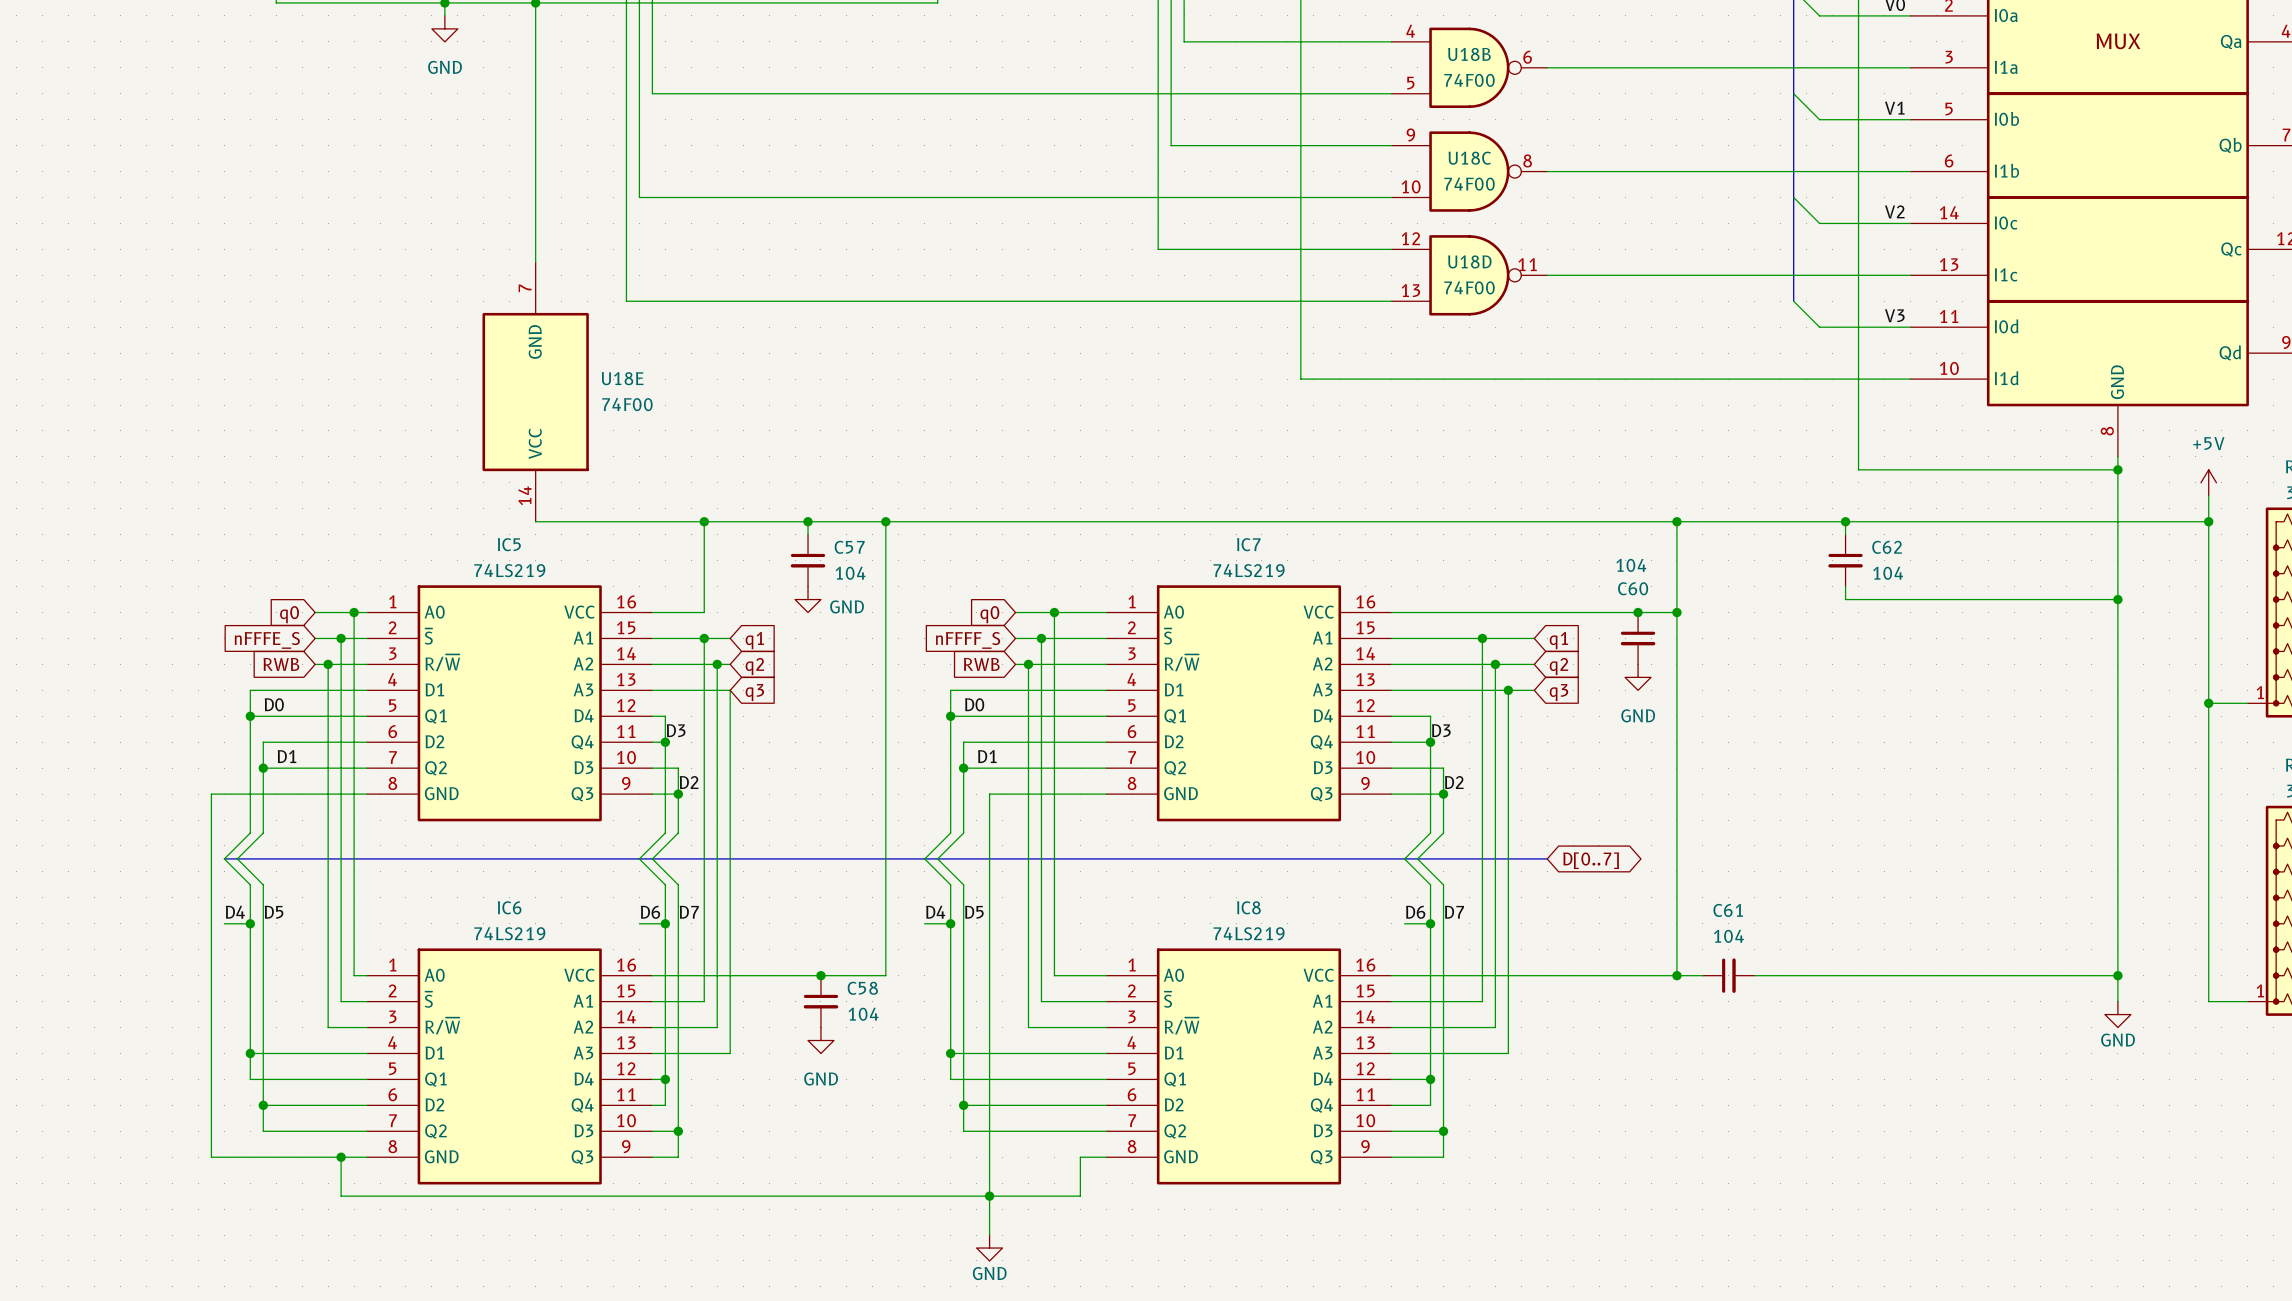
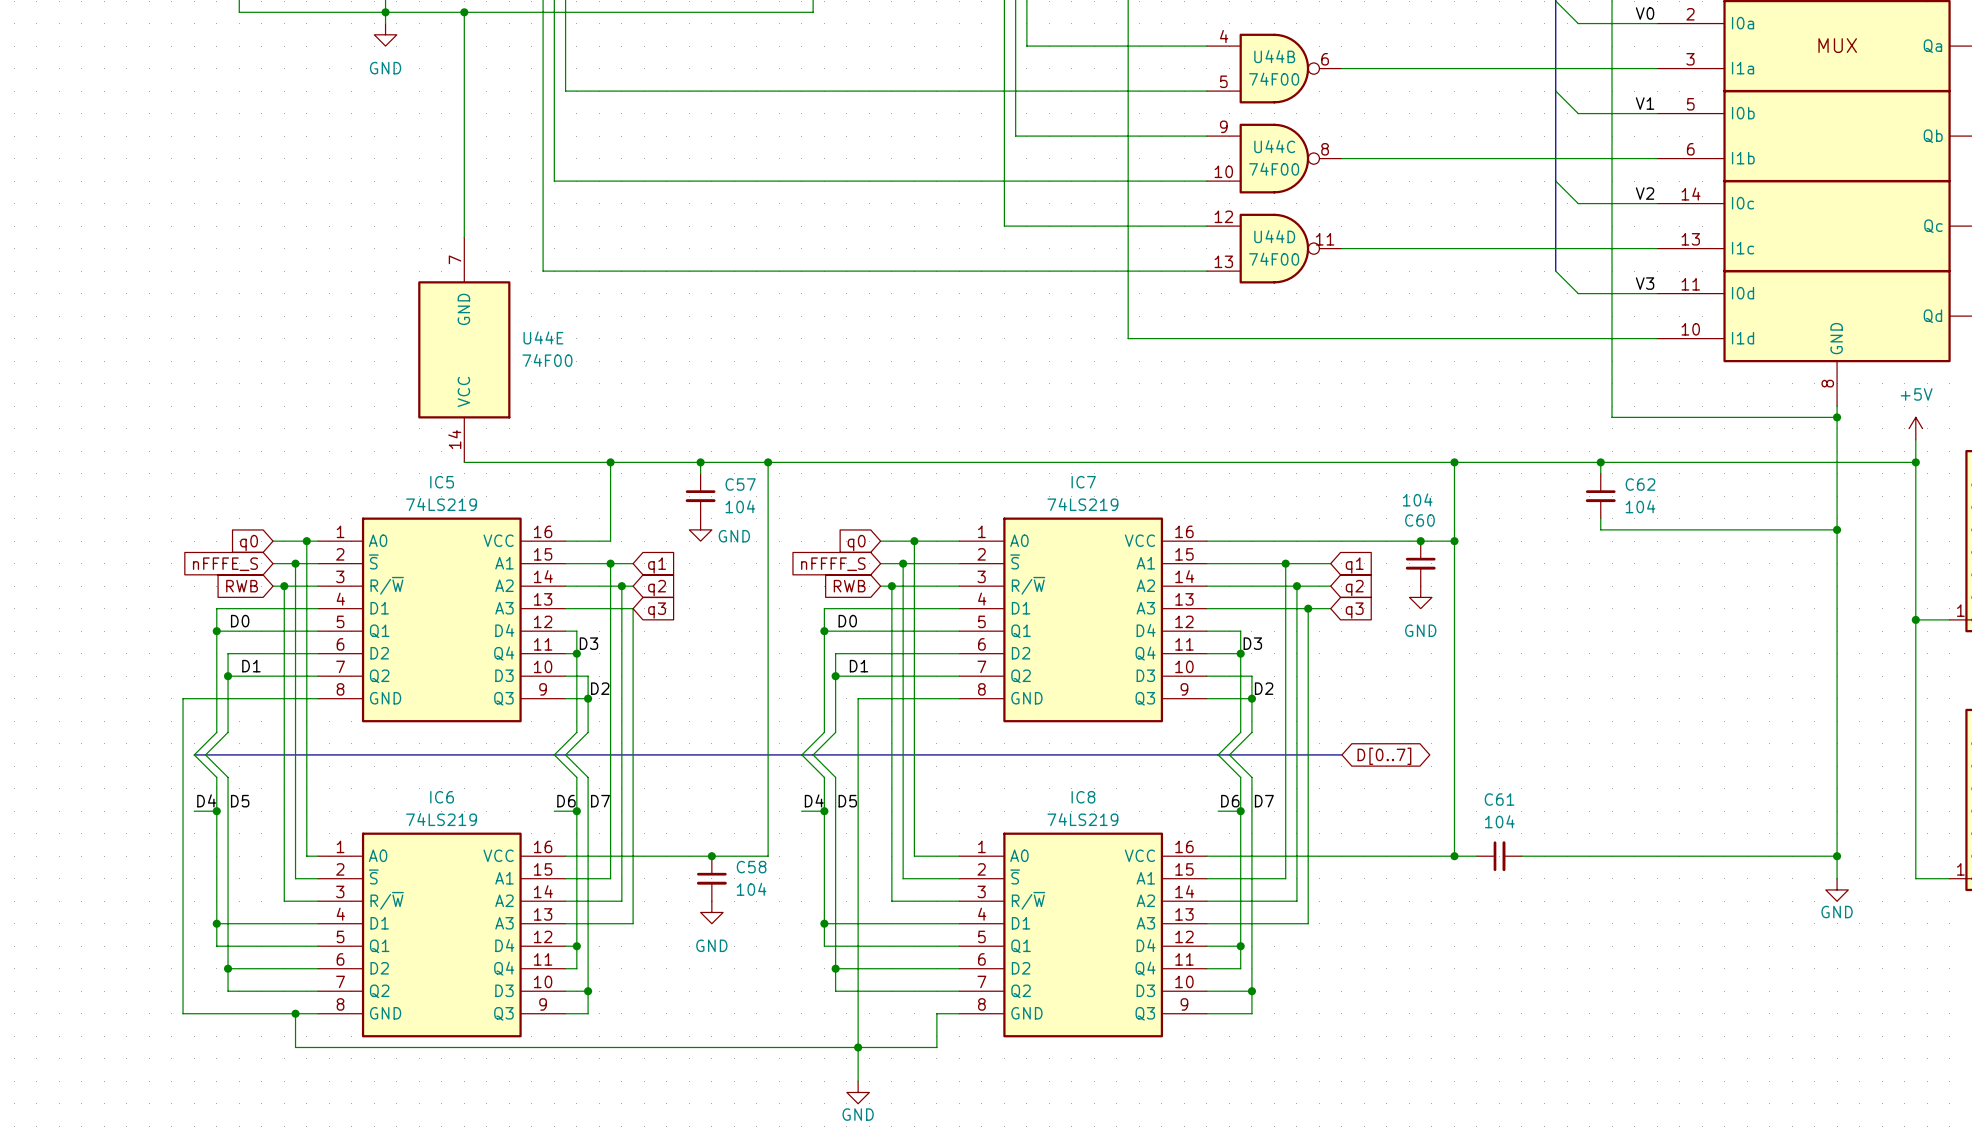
U18B name: U18B (1469, 54) -> U44B (1274, 56)
U18C name: U18C (1469, 158) -> U44C (1274, 146)
U18D name: U18D (1469, 261) -> U44D (1274, 236)
U18E name: U18E (622, 378) -> U44E (543, 337)

